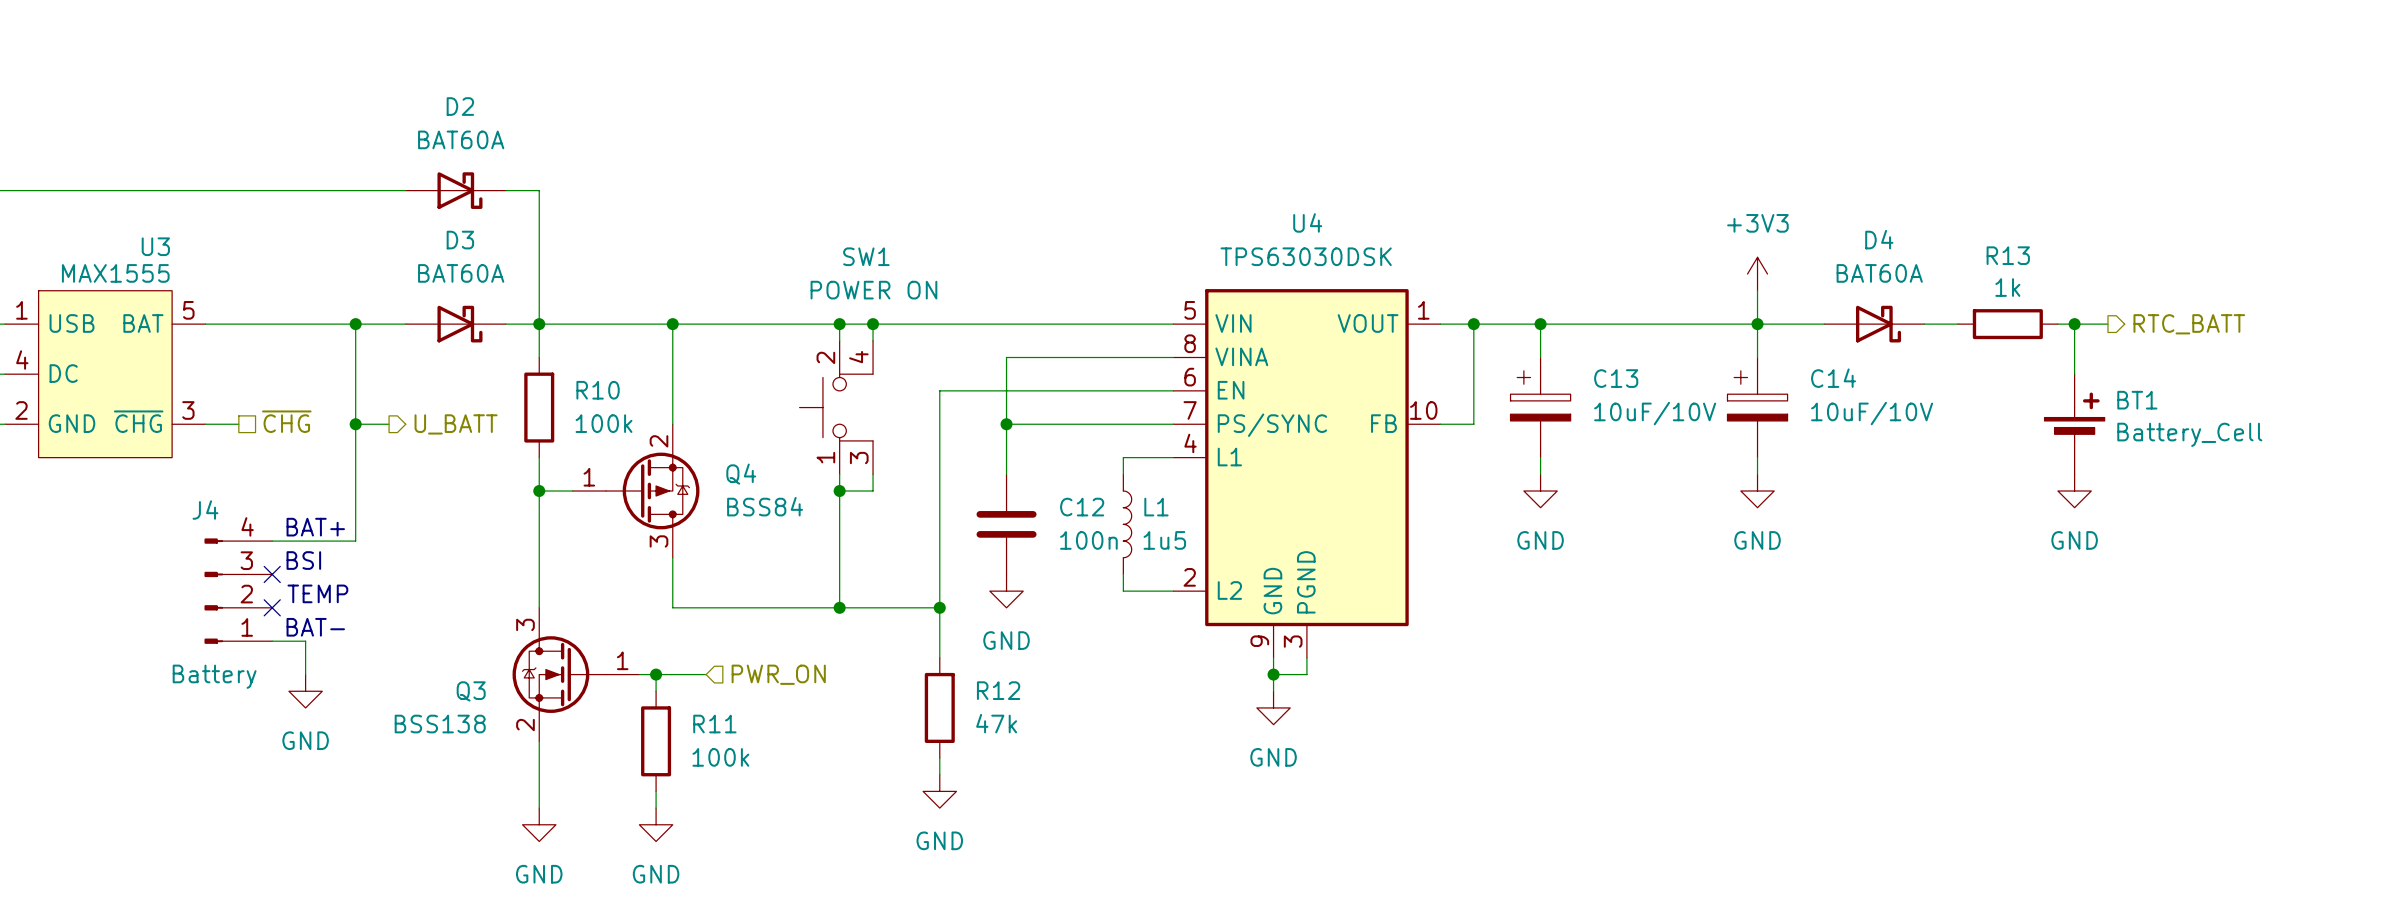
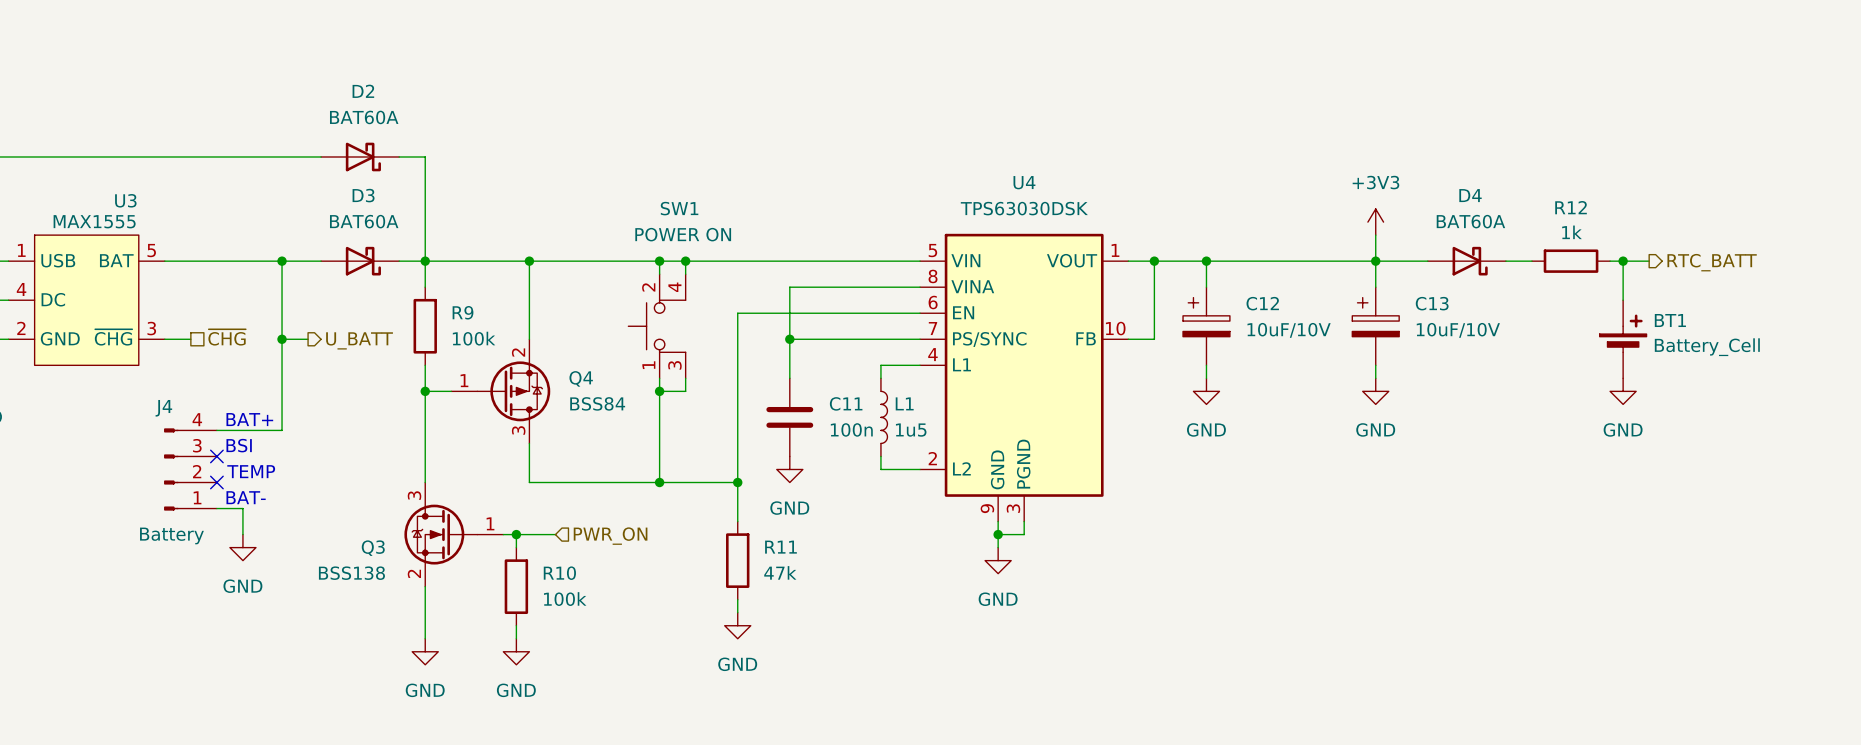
R13 name: R13 (2008, 255) -> R12 (1571, 207)
C13 name: C13 (1616, 378) -> C12 (1262, 303)
C14 name: C14 (1833, 378) -> C13 (1432, 303)
R10 name: R10 (598, 390) -> R9 (463, 312)
C12 name: C12 (1082, 507) -> C11 (846, 403)
R12 name: R12 (998, 690) -> R11 (780, 547)
R11 name: R11 (714, 724) -> R10 (559, 573)

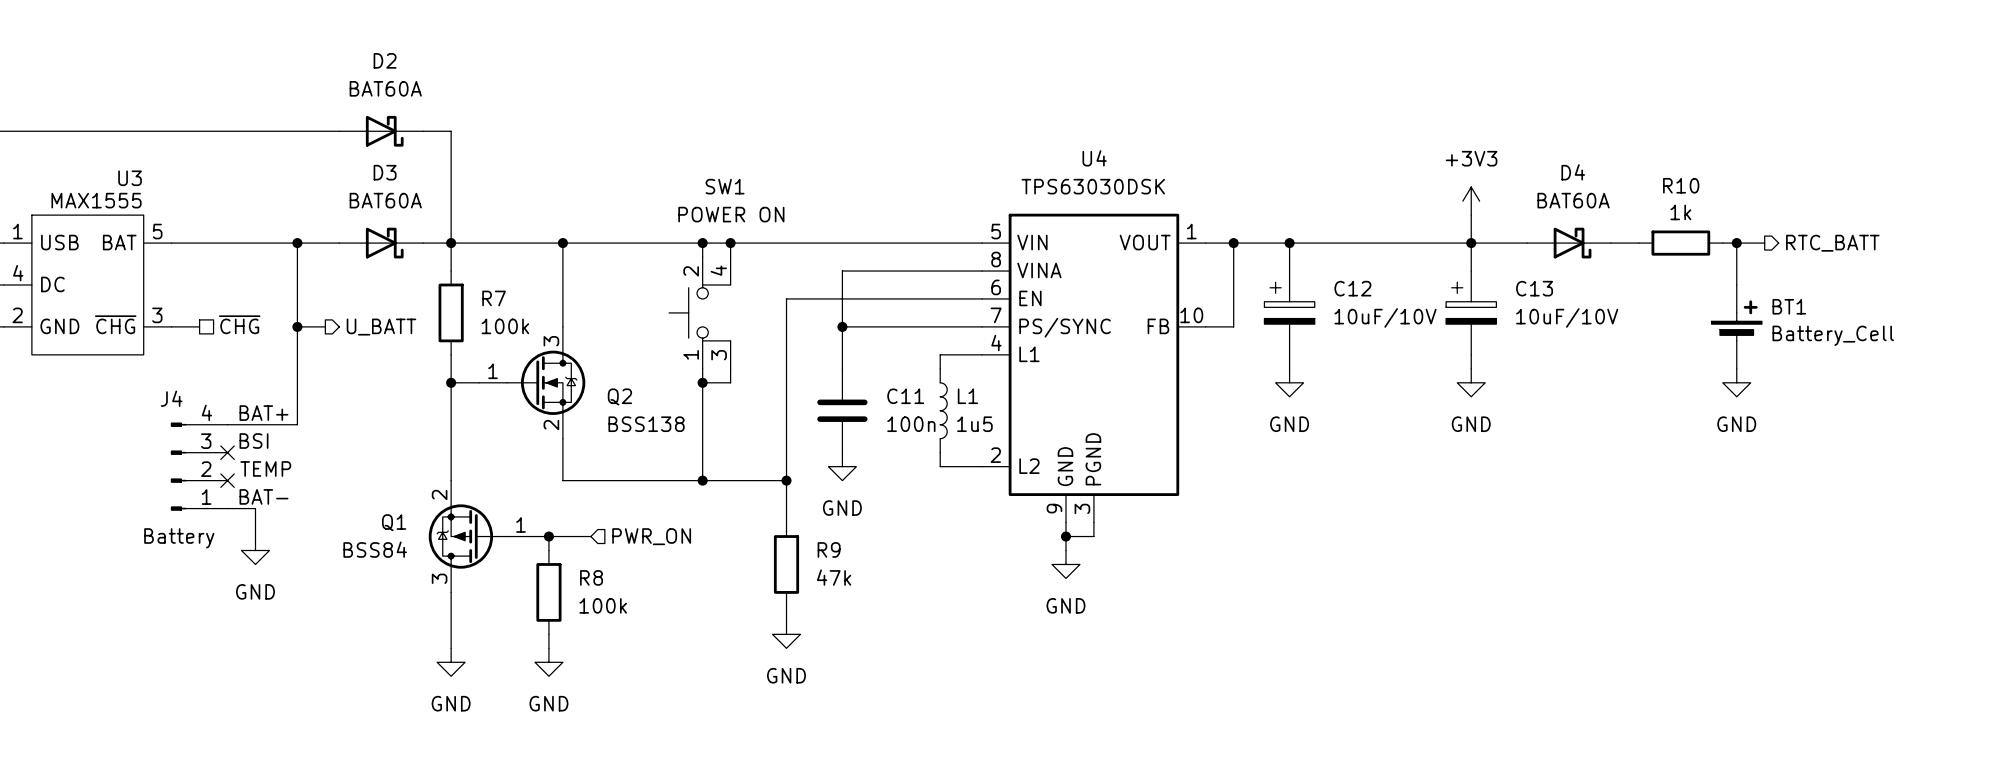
R12 name: R12 (1571, 207) -> R10 (1681, 185)
R9 name: R9 (463, 312) -> R7 (494, 298)
Q4: BSS84 (500, 391) -> none
Q2: none -> BSS138 (532, 382)
Q3: BSS138 (453, 534) -> none
Q1: none -> BSS84 (481, 536)
R11 name: R11 (780, 547) -> R9 (829, 549)
R10 name: R10 (559, 573) -> R8 (591, 577)

